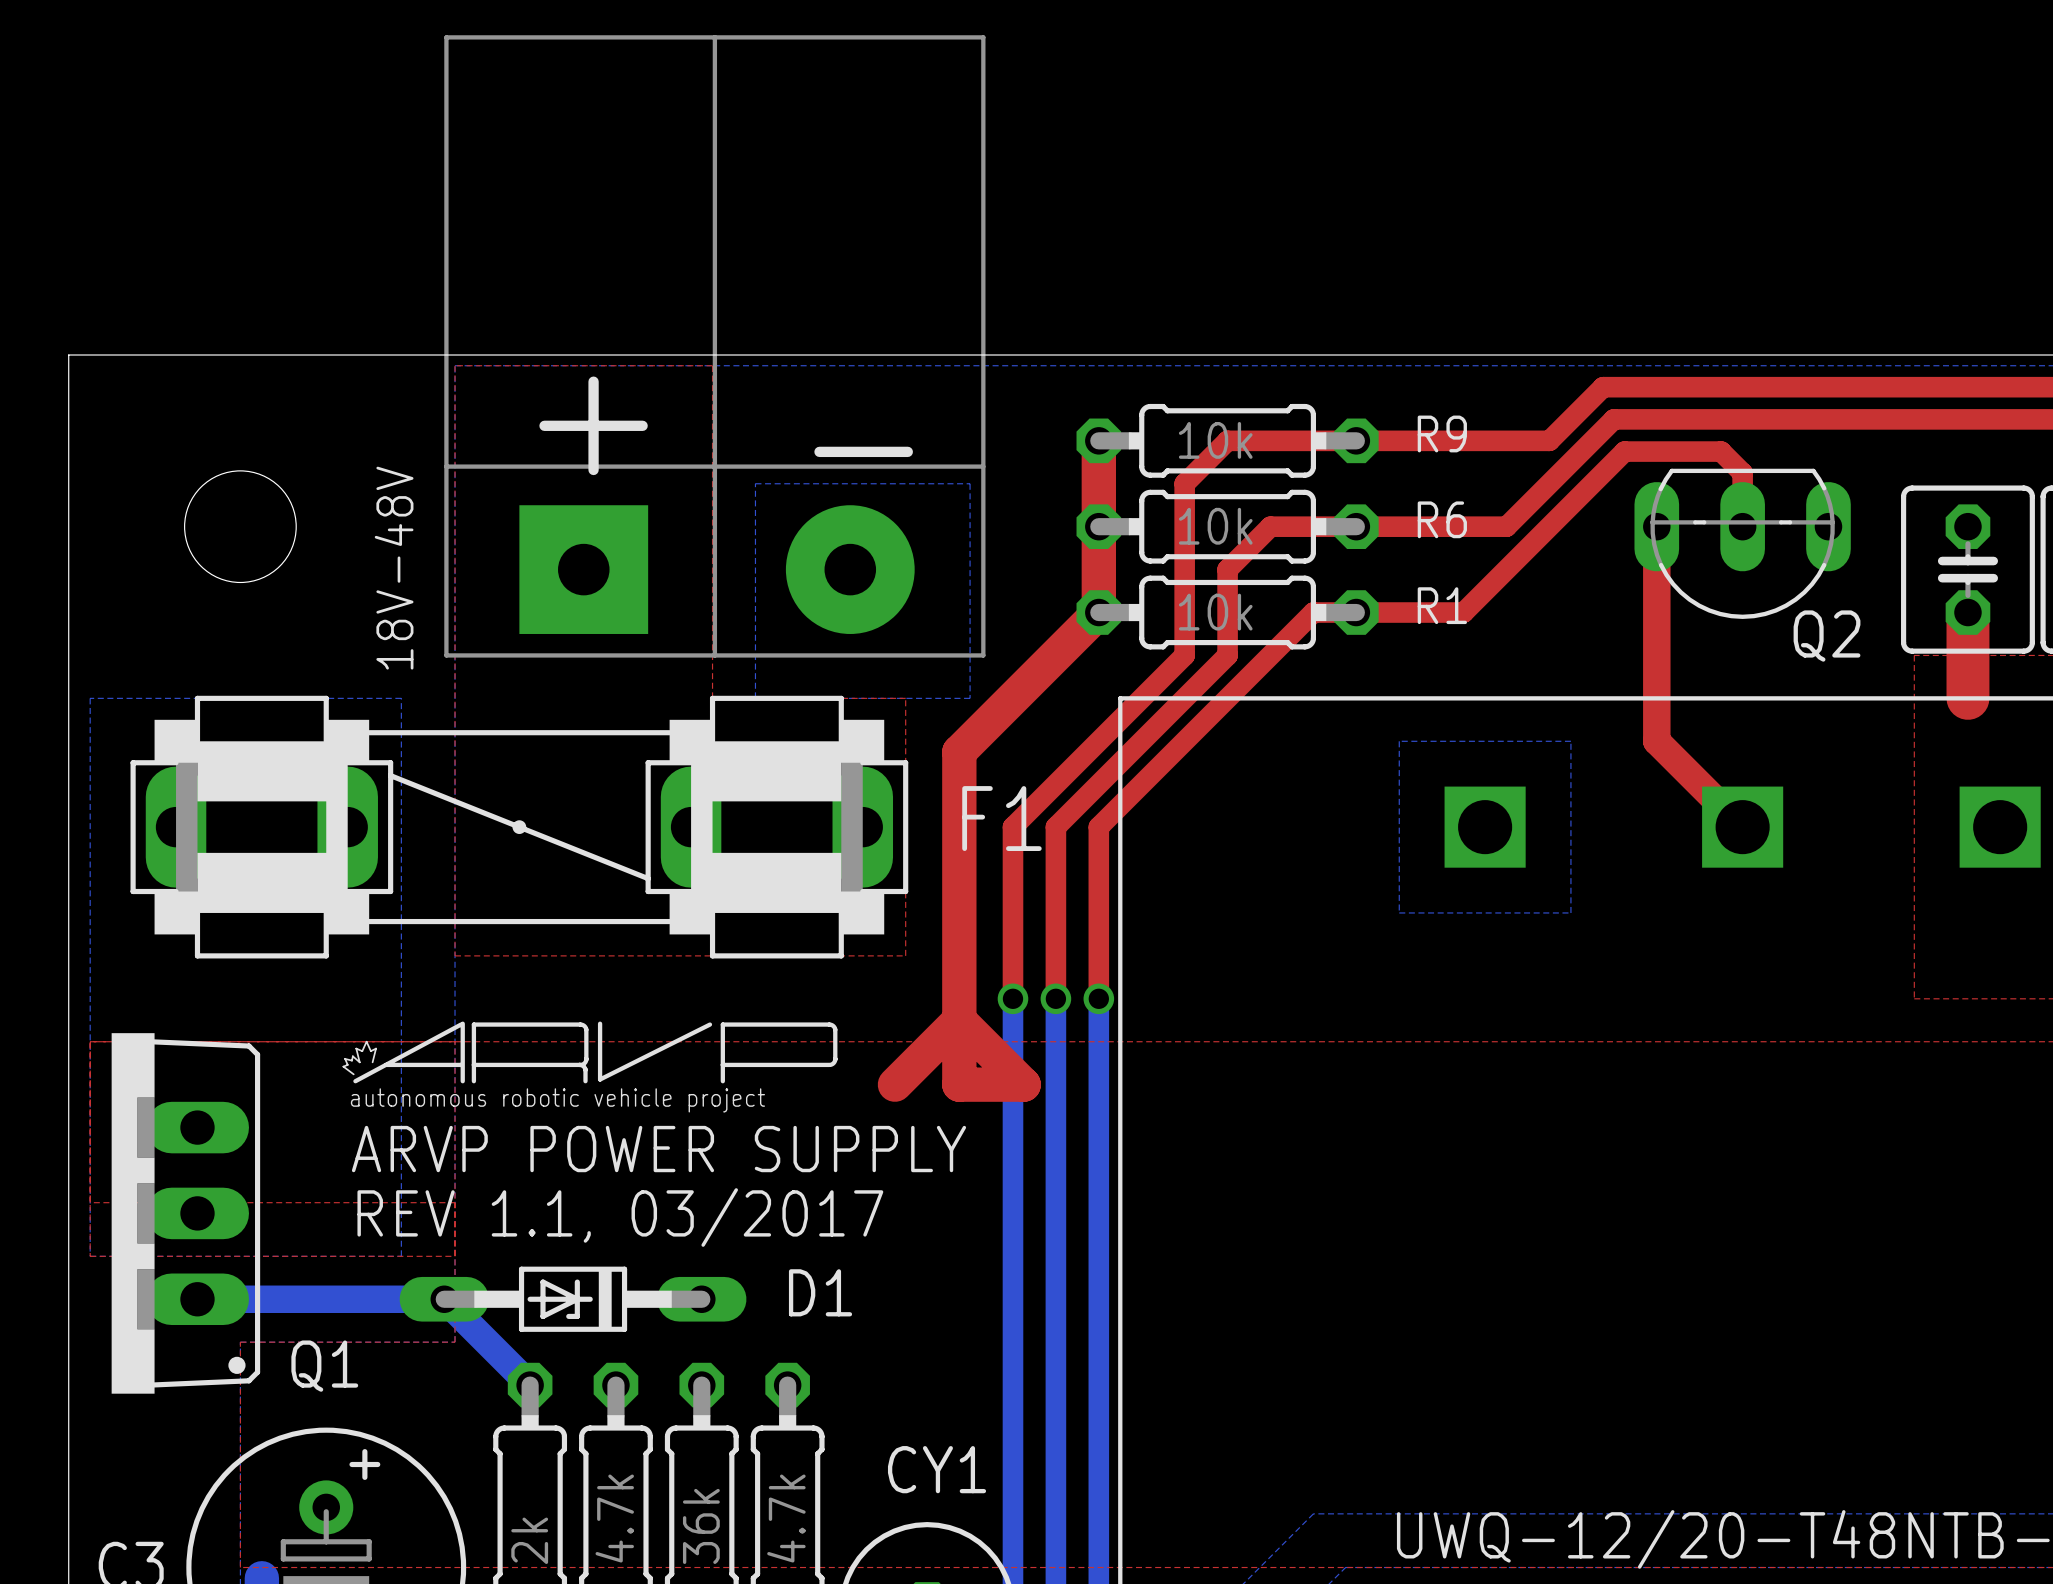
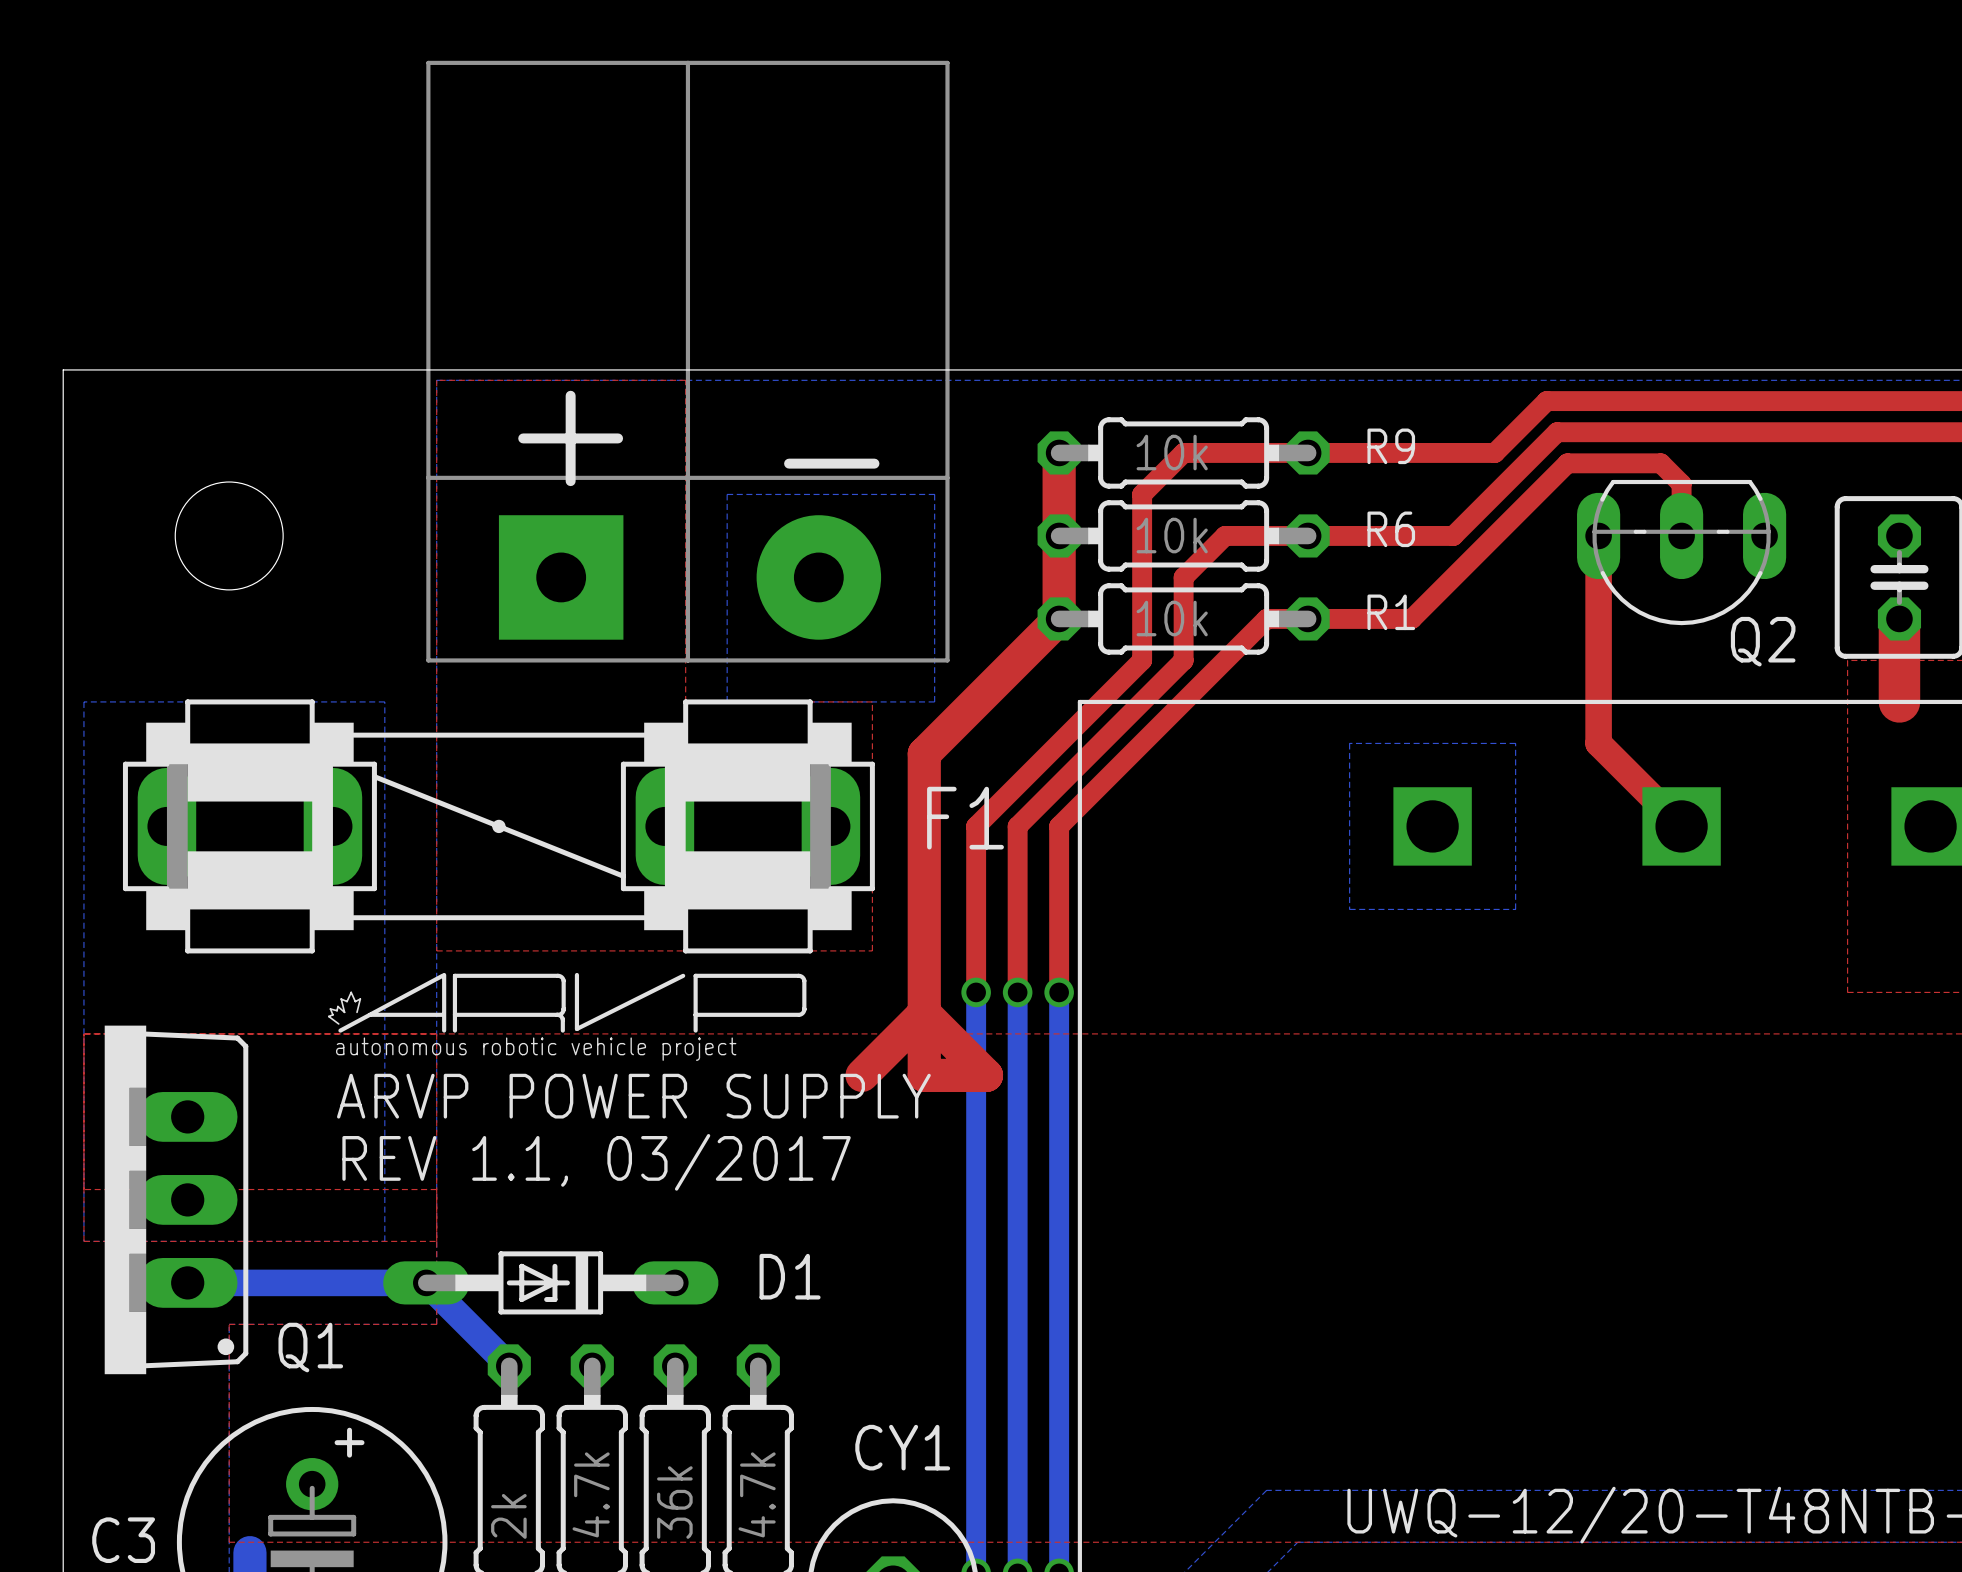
text: 18V-48V (394, 568) -> none
drawing position: (589, 1052) -> (567, 1002)
text position: ARVP POWER SUPPLY (659, 1149) -> ARVP POWER SUPPLY (633, 1096)
text position: REV 1.1, 03/2017 (620, 1217) -> REV 1.1, 03/2017 (596, 1162)

